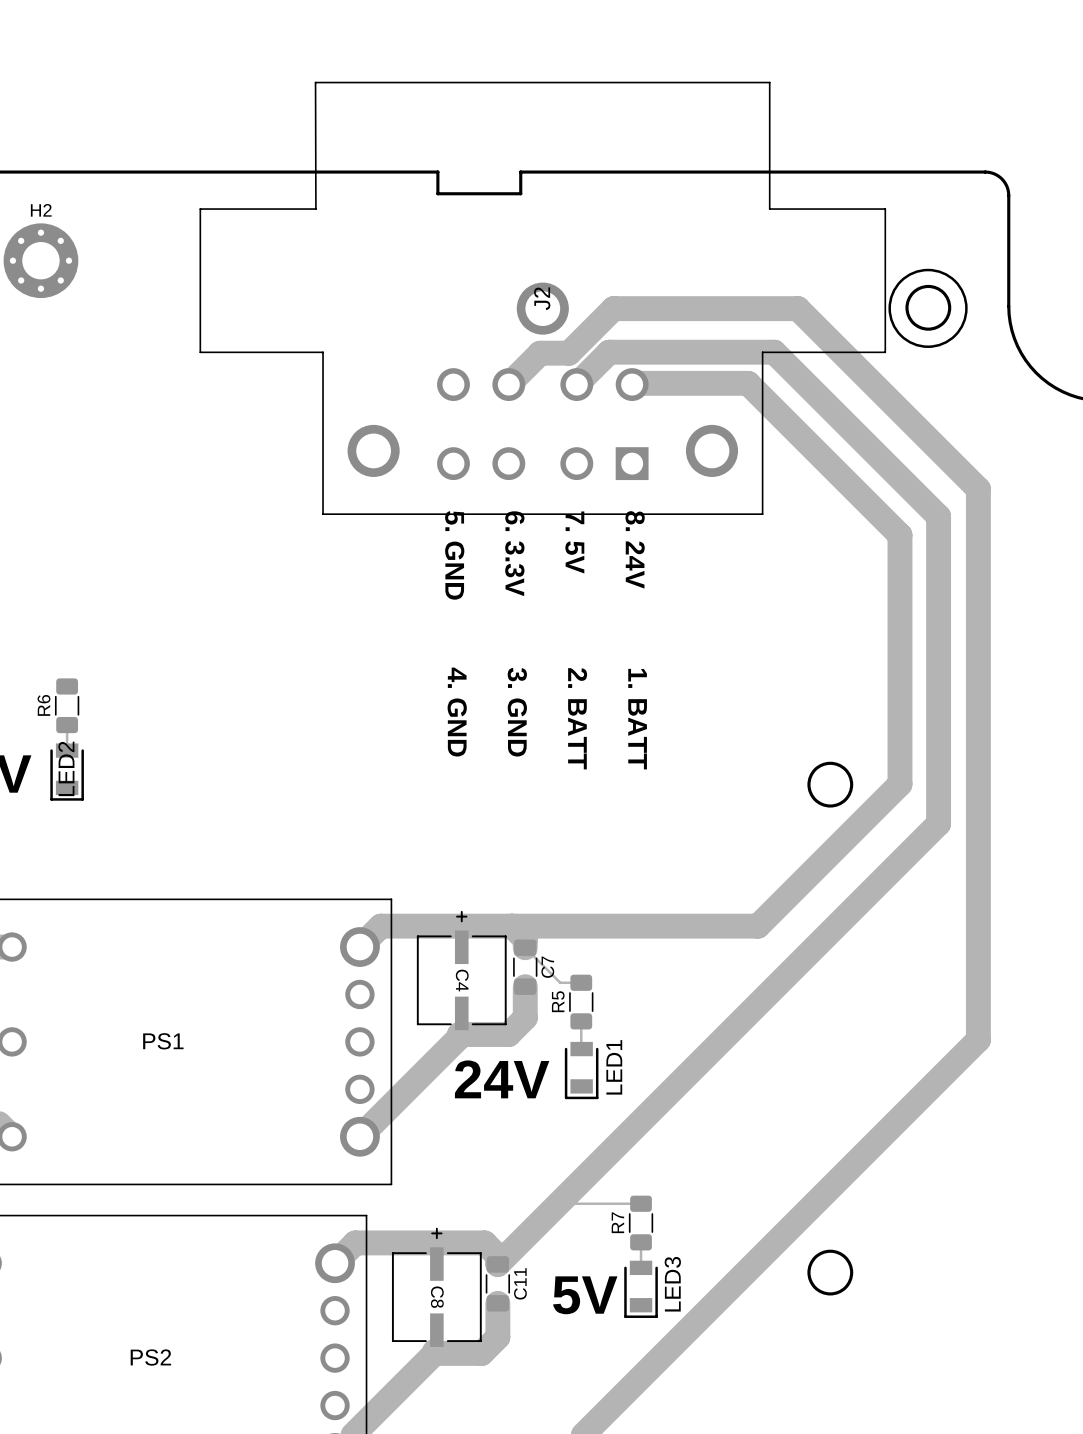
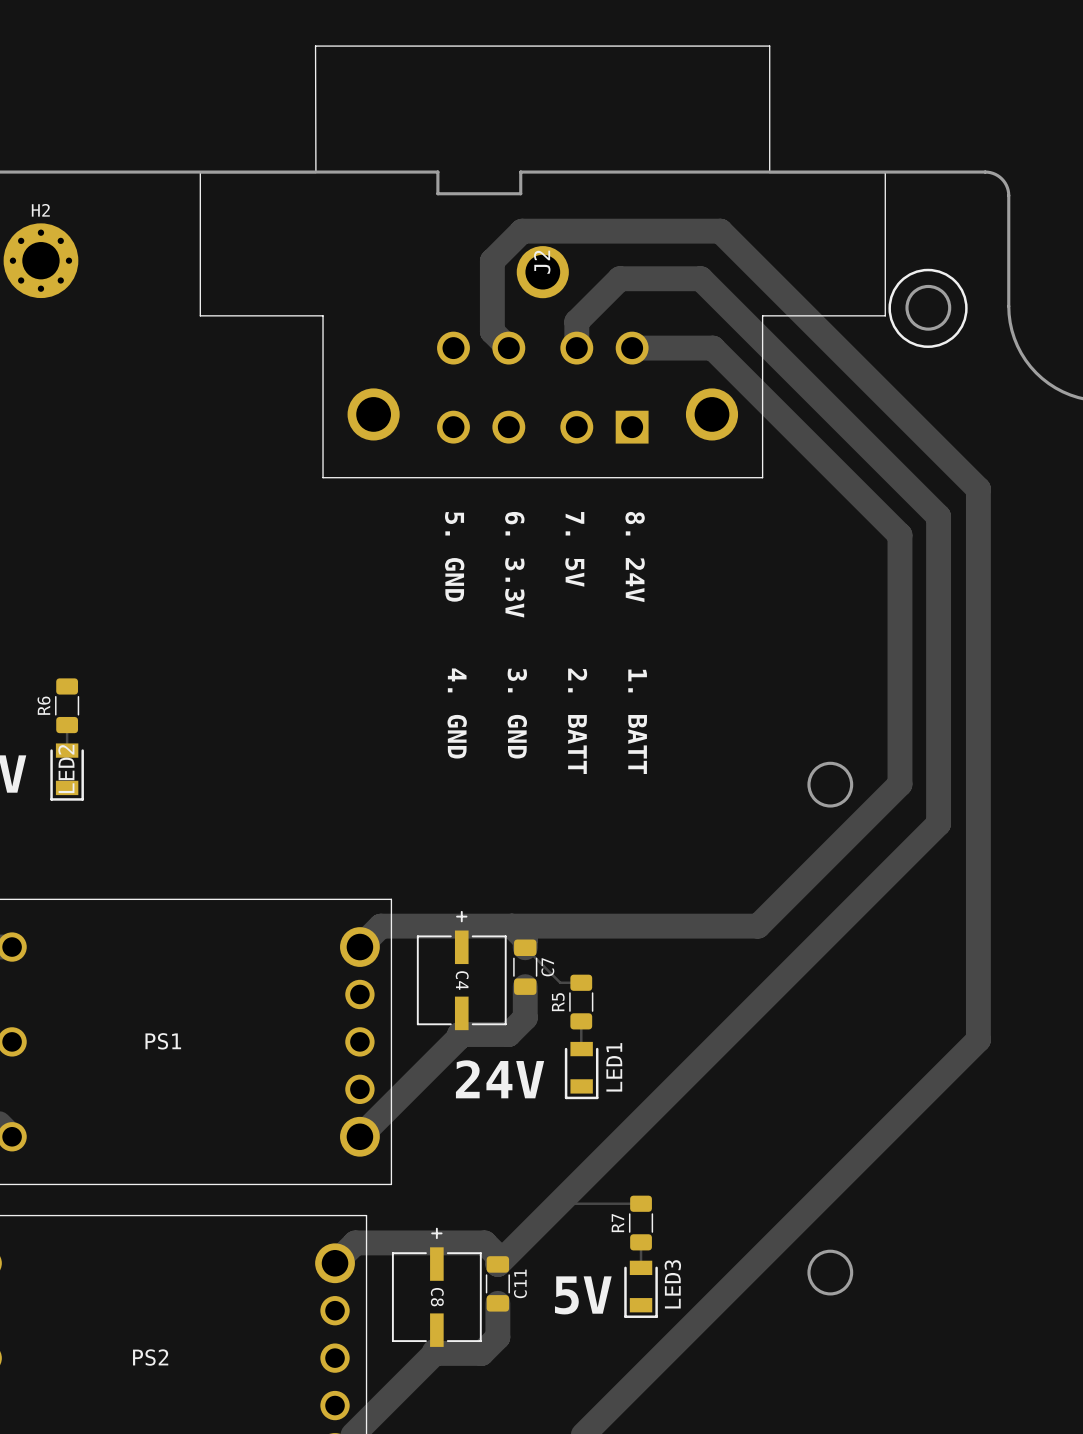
J2 position: (542, 298) -> (542, 261)
track: (797, 308) (613, 308) (569, 353) (540, 353) (508, 384) -> (797, 308) (720, 231) (522, 231) (492, 260) (492, 331) (508, 348)
track: (774, 352) (609, 352) (576, 384) -> (774, 352) (700, 278) (619, 278) (576, 321) (576, 348)
track: (748, 383) (632, 384) -> (748, 383) (712, 348) (632, 348)

